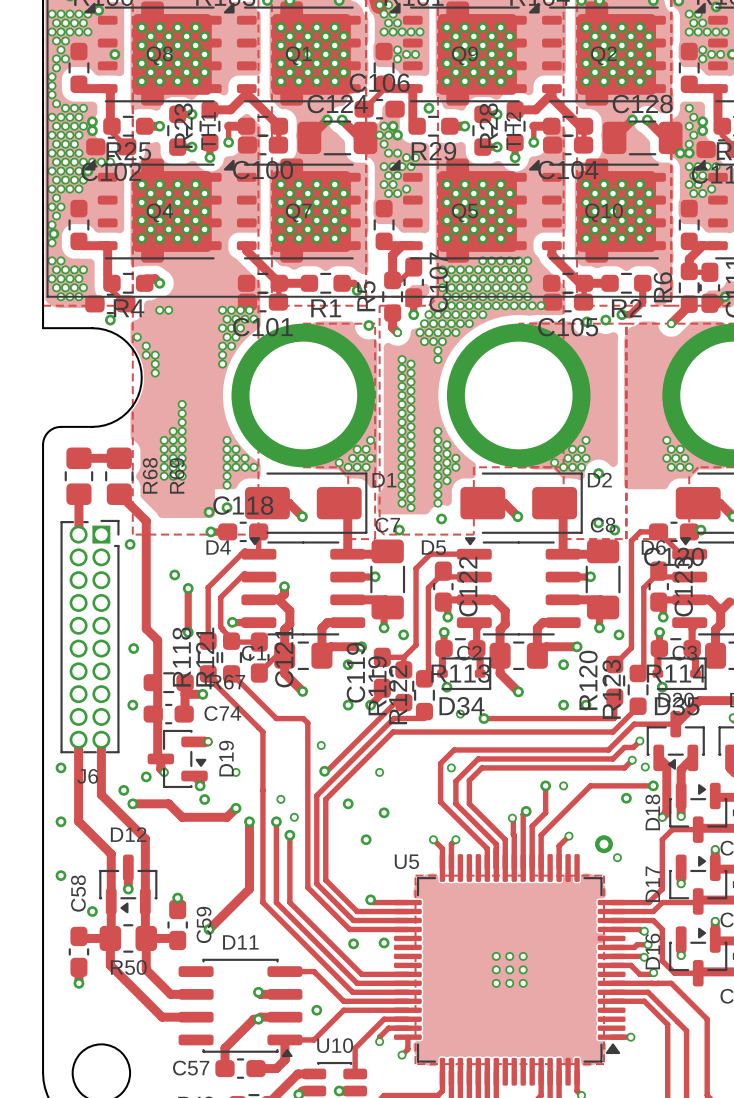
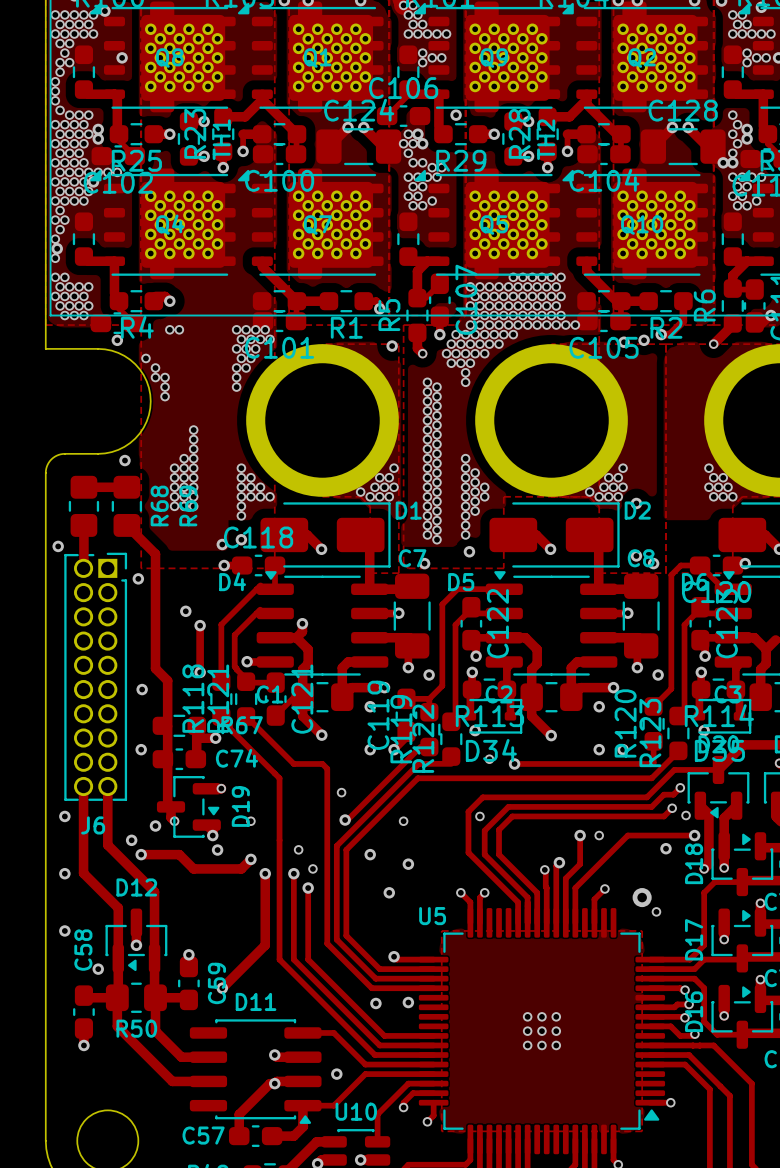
via: none -> (124, 460)
via: none -> (58, 546)

